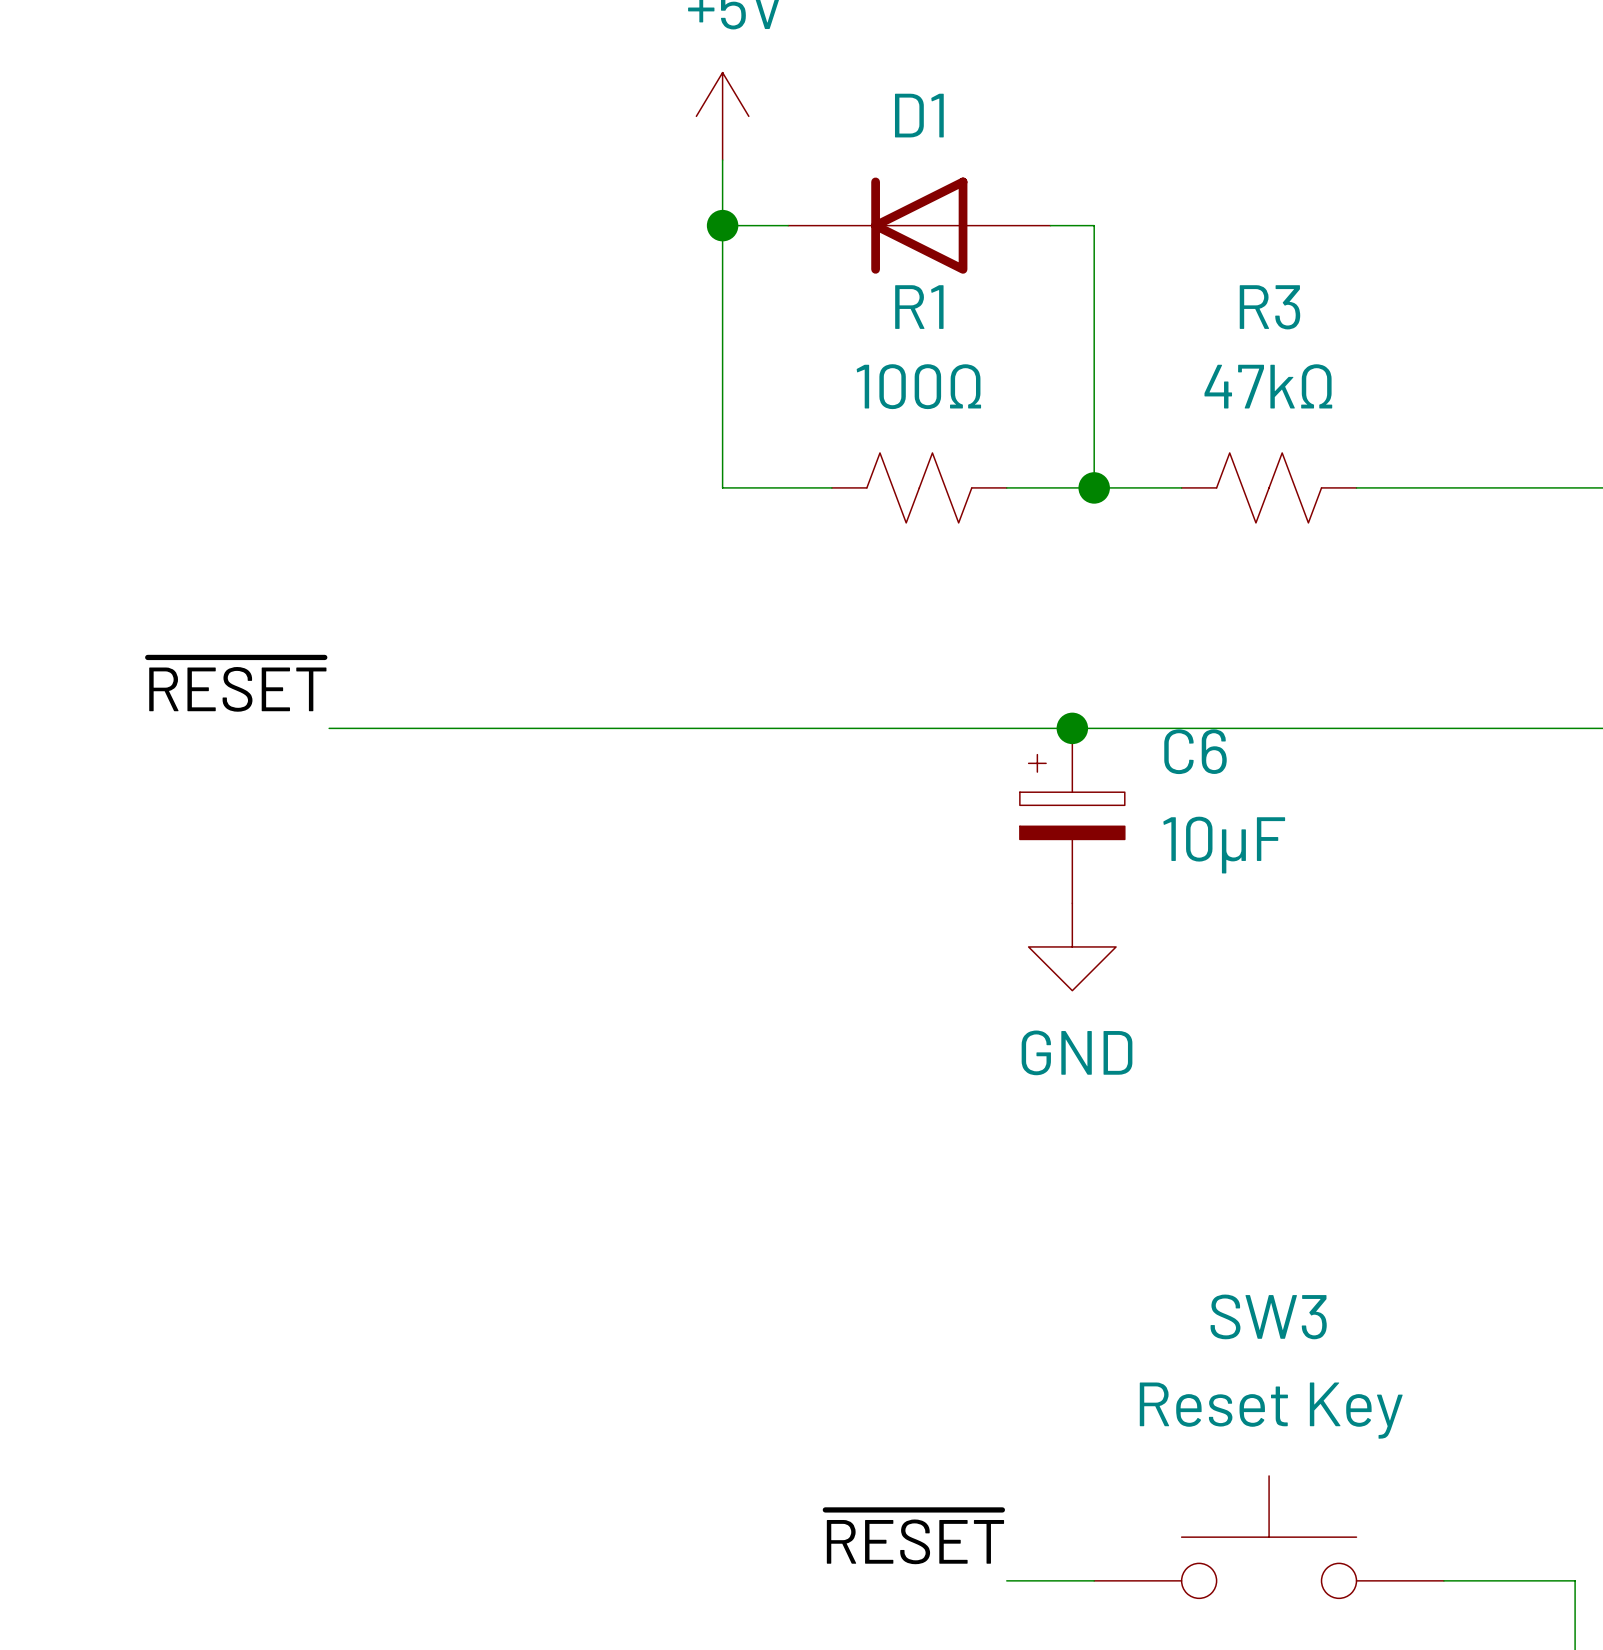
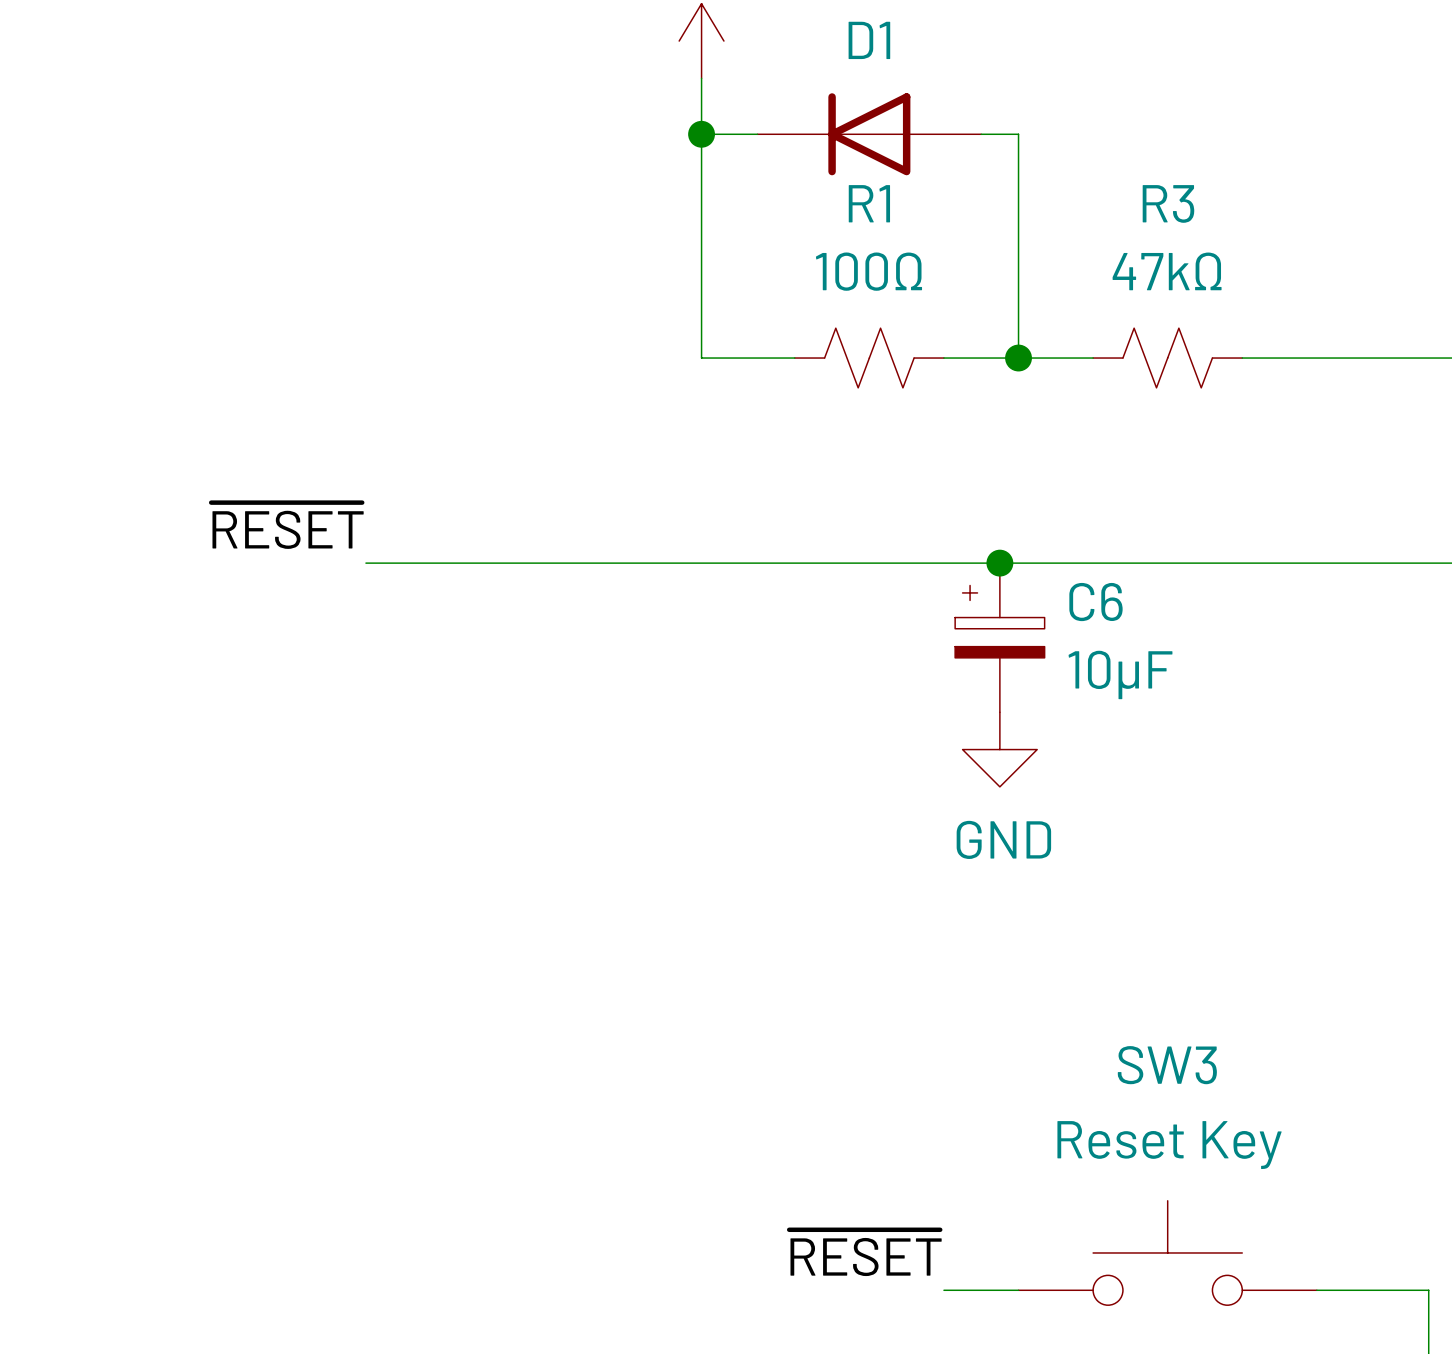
C6 name position: C6 (1195, 751) -> C6 (1095, 602)
C6 value position: 10µF (1224, 845) -> 10µF (1120, 674)

